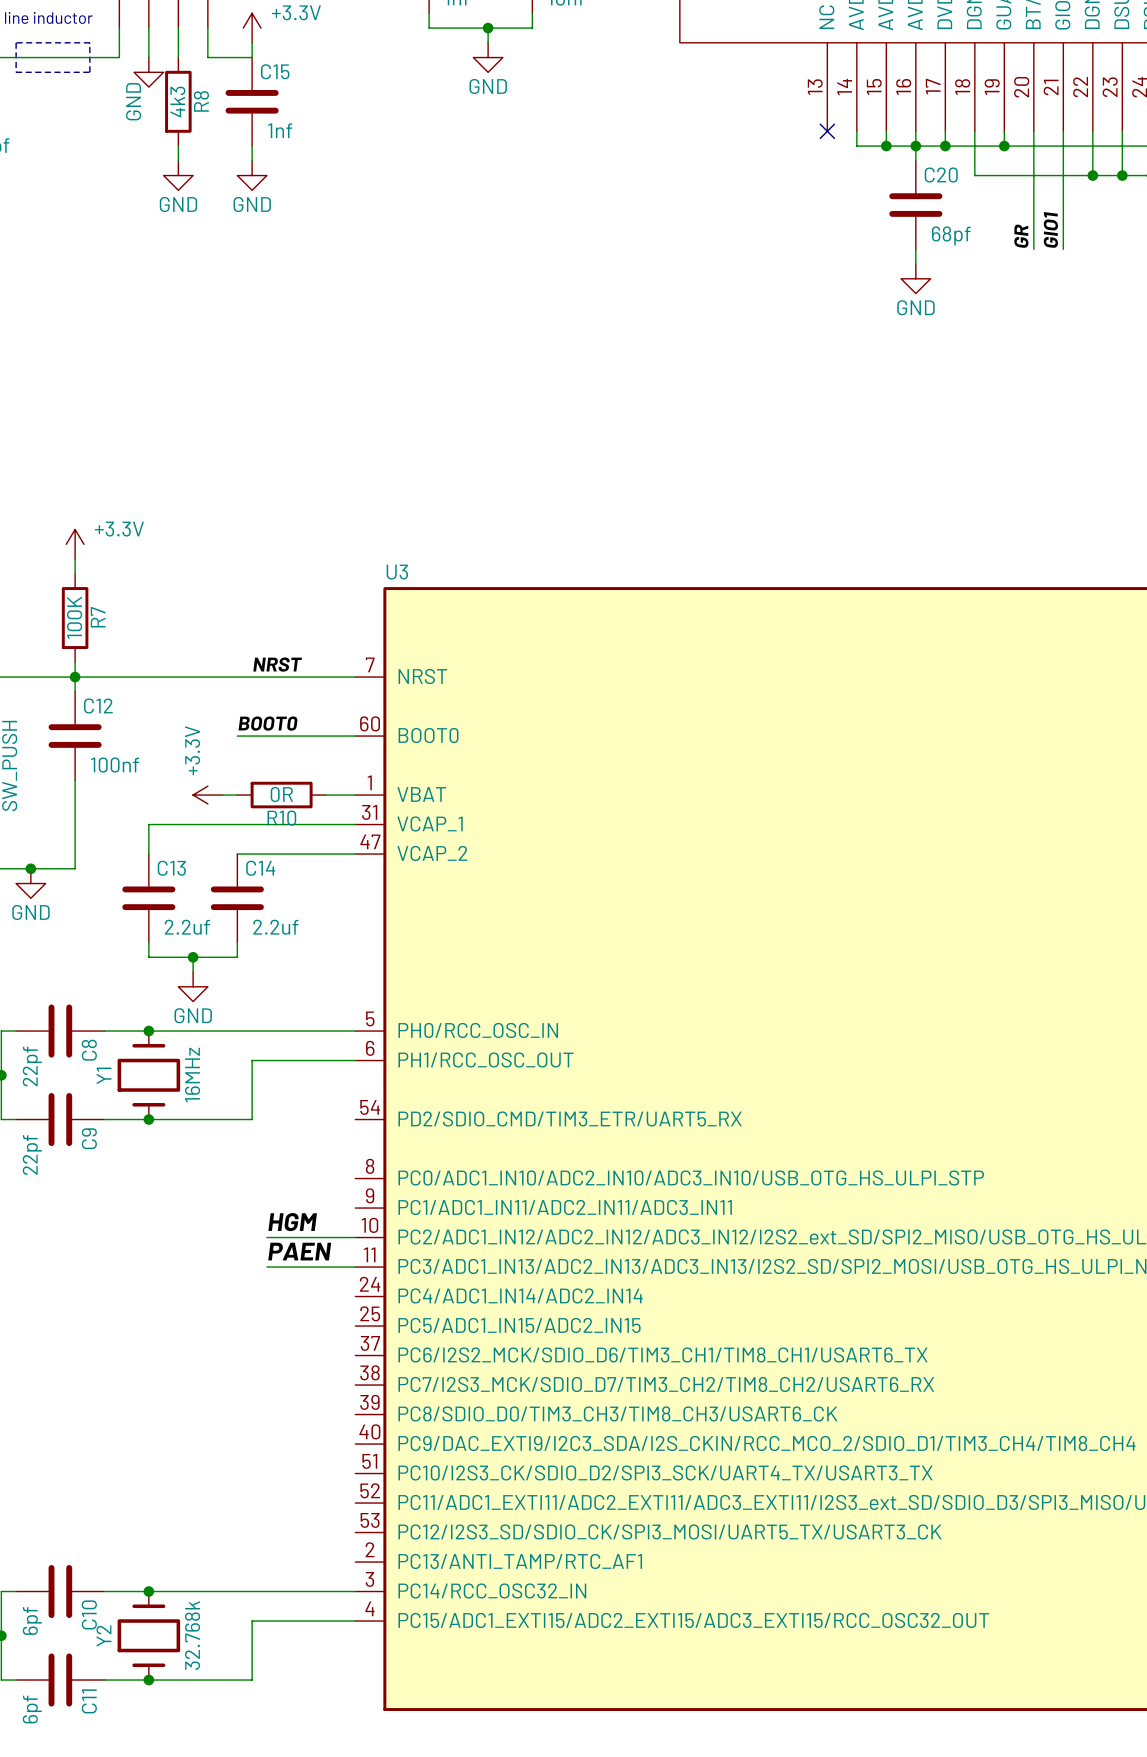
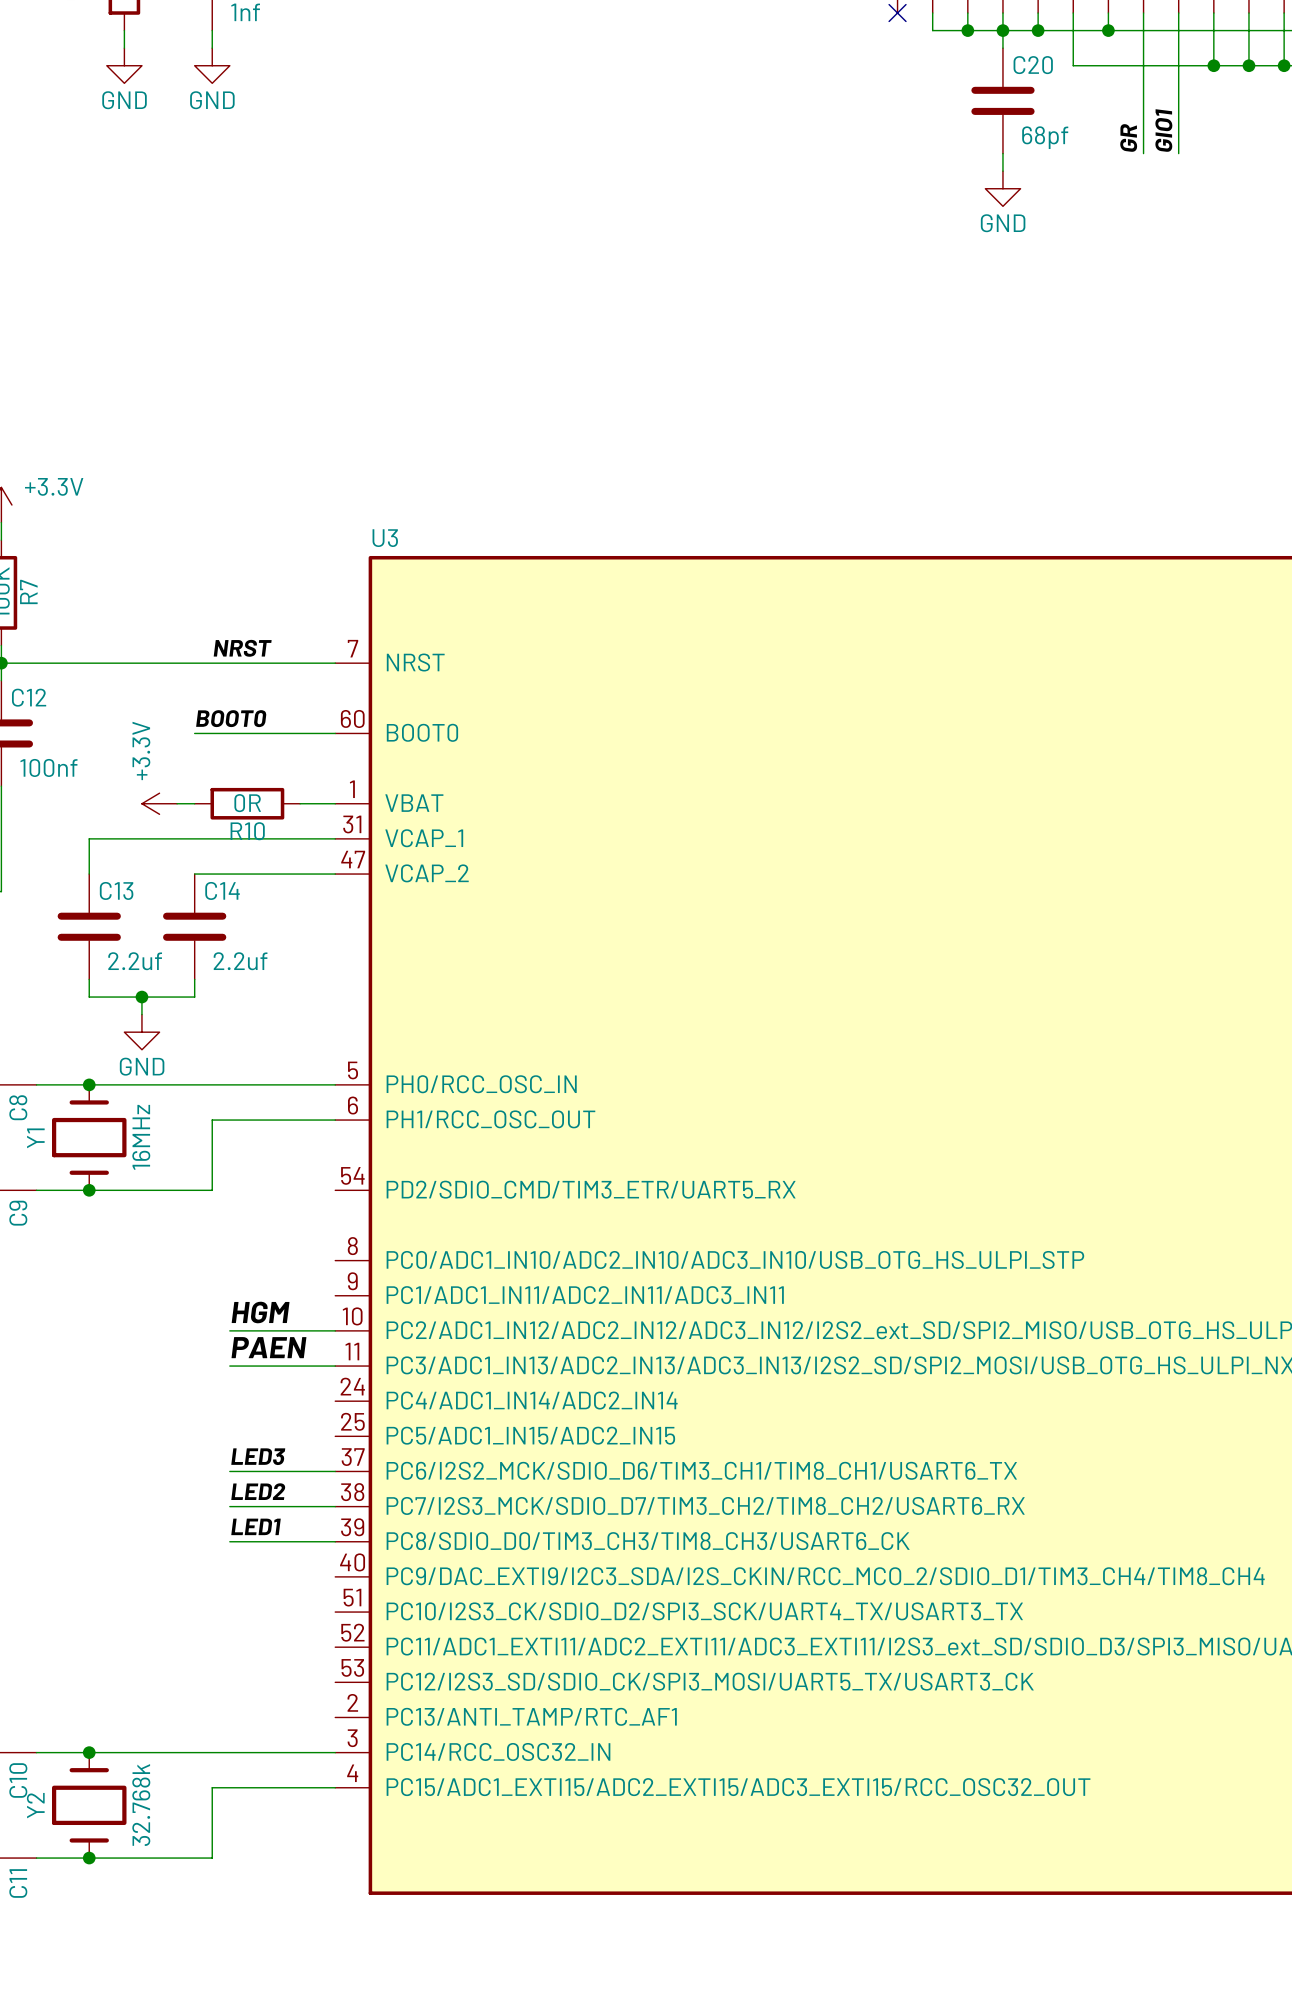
label: none -> LED3 (258, 1456)
wire: none -> (229, 1471) (335, 1471)
label: none -> LED2 (258, 1491)
wire: none -> (229, 1506) (335, 1506)
label: none -> LED1 (256, 1526)
wire: none -> (229, 1541) (335, 1541)

